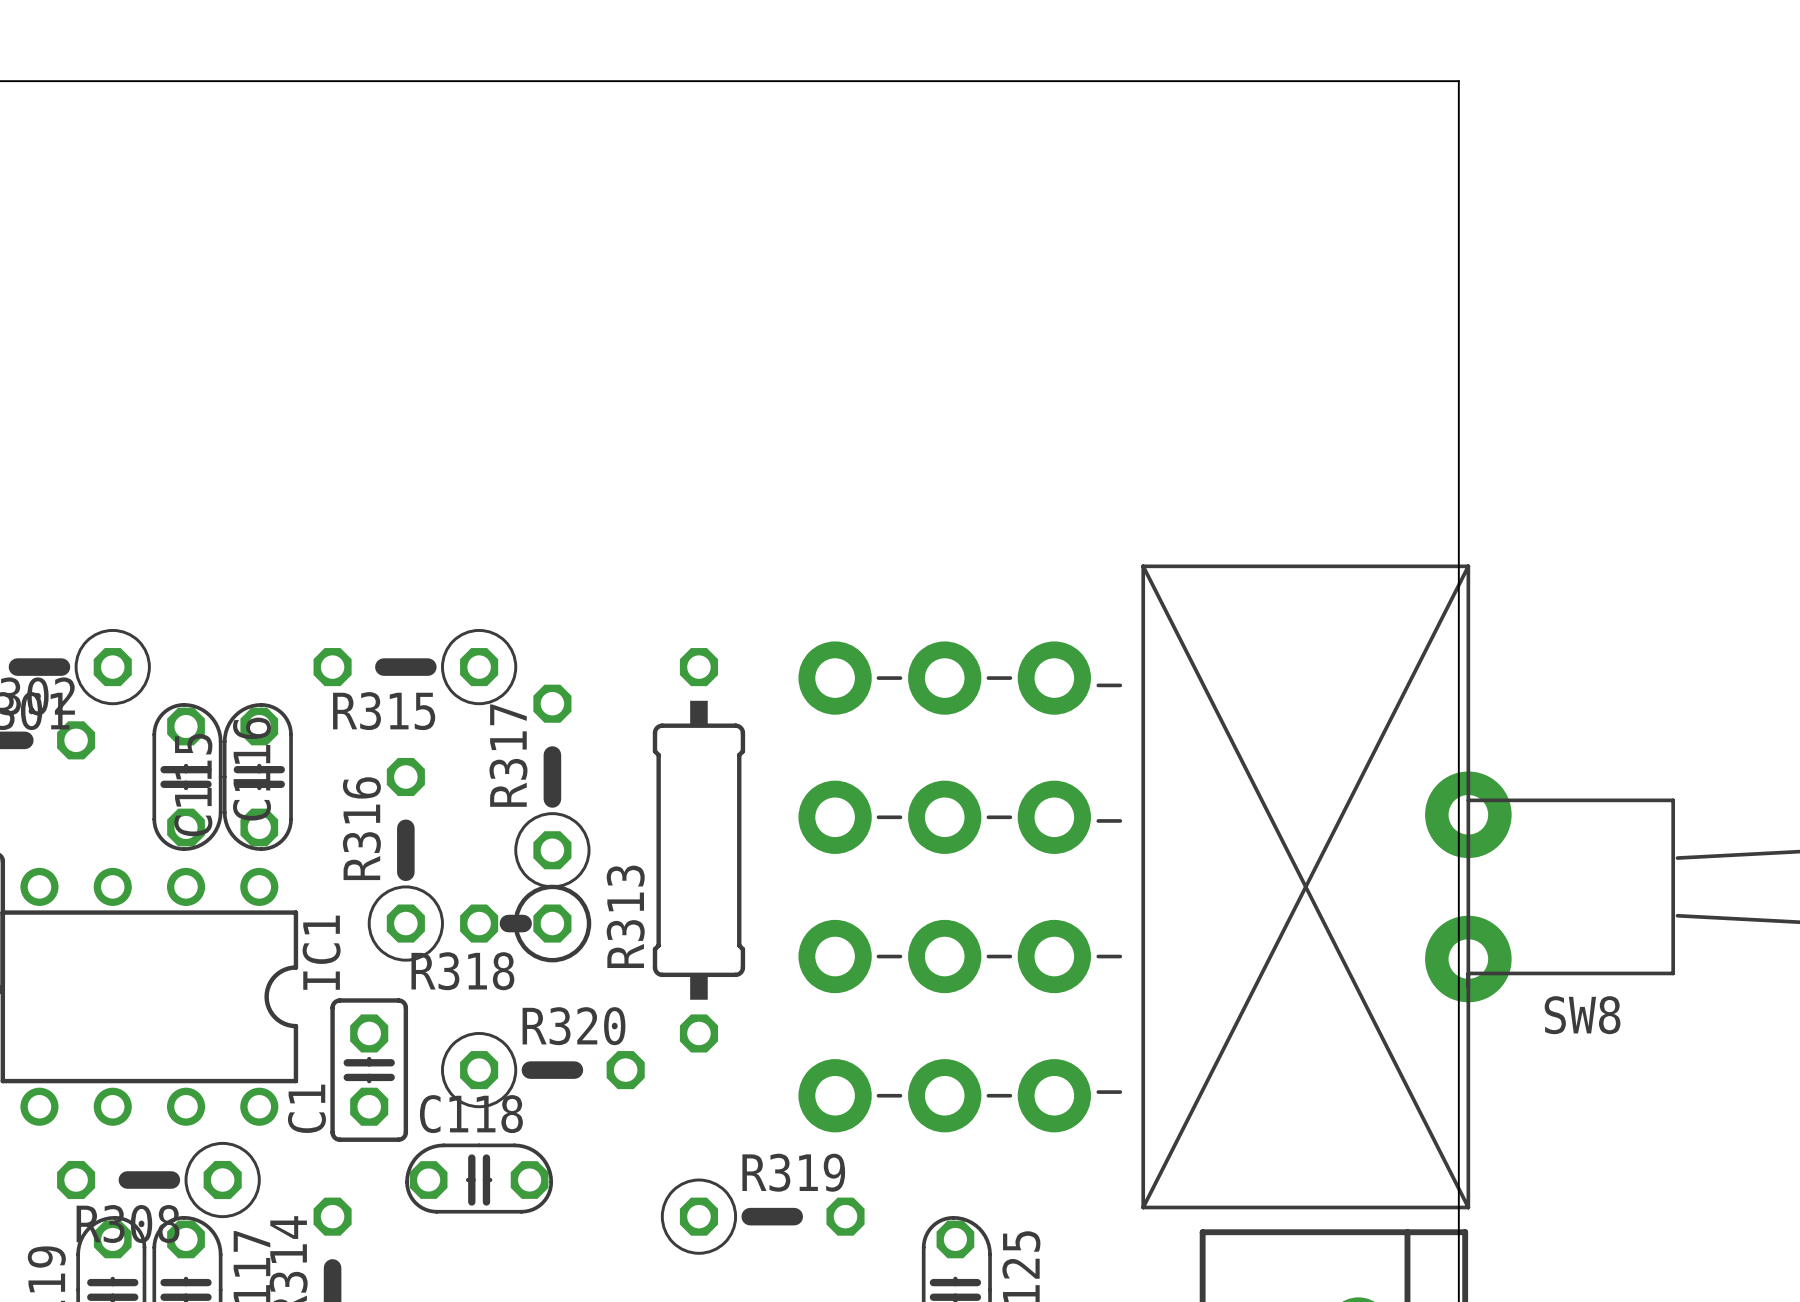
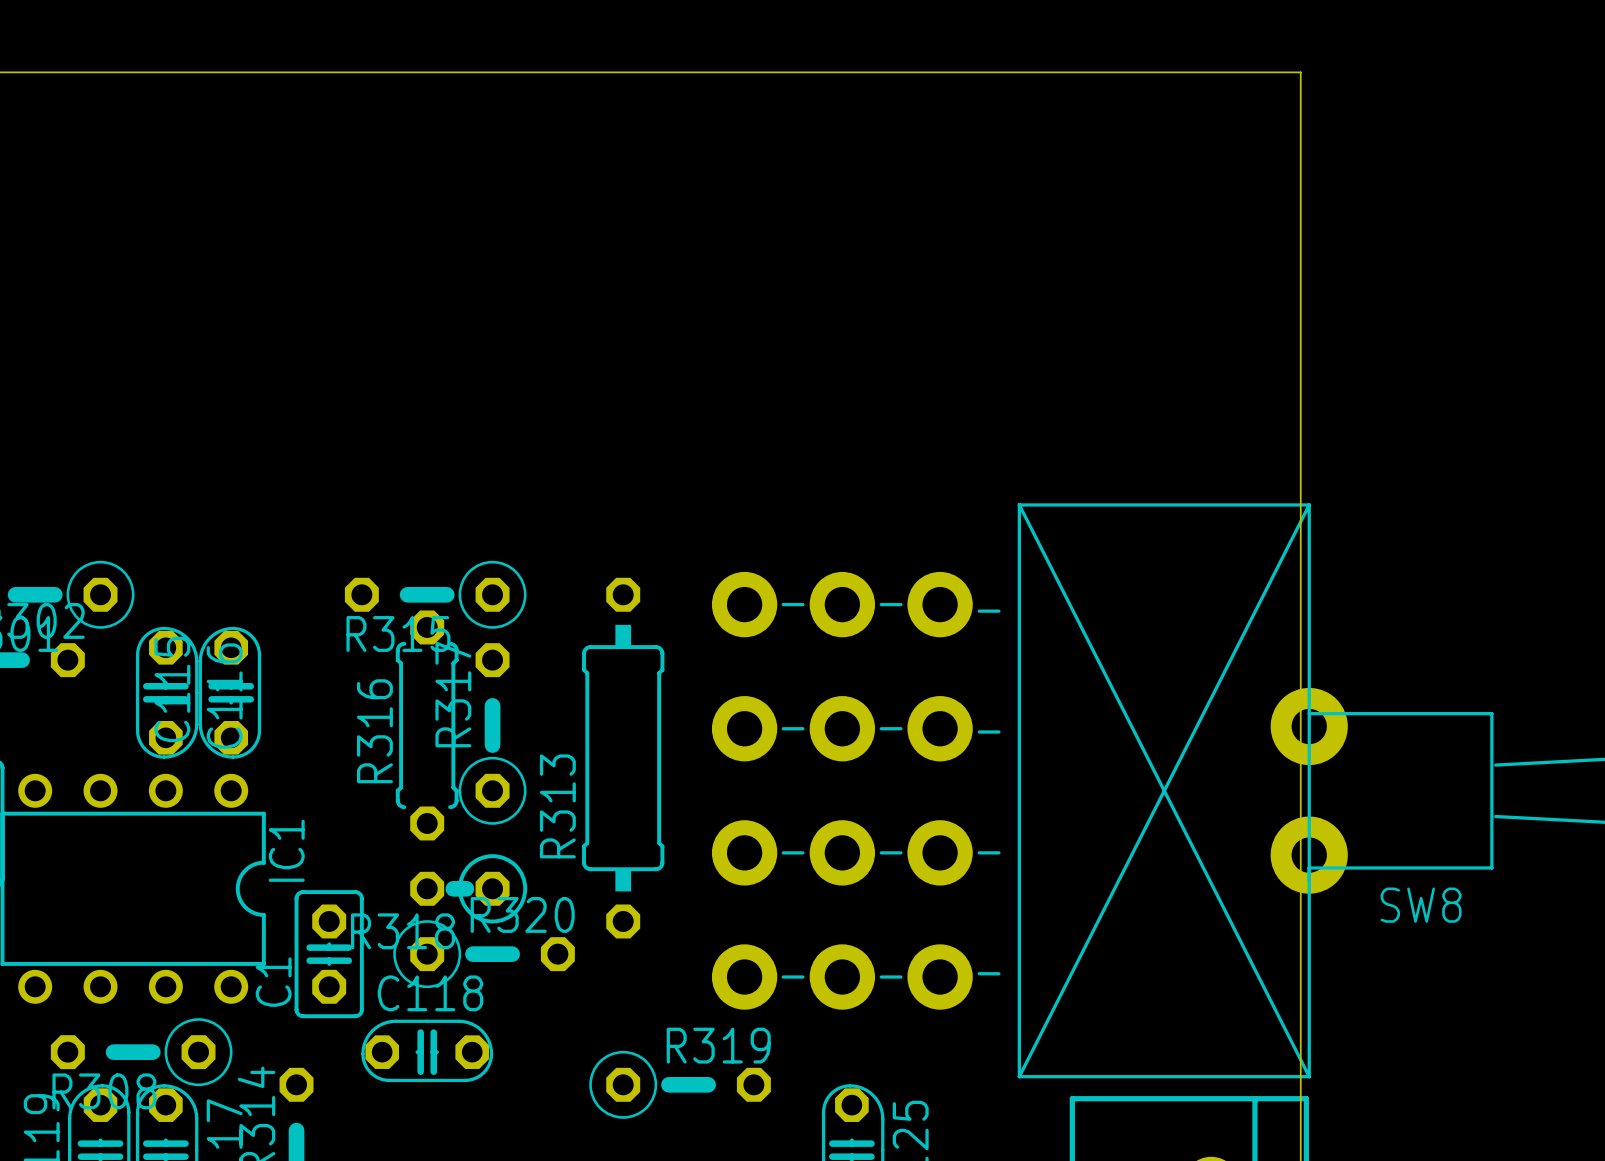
R315 position: (415, 667) -> (435, 594)
R316 footprint: [367, 757, 444, 962] -> [395, 610, 459, 841]
R317 position: (552, 786) -> (492, 733)
R318 position: (525, 923) -> (468, 888)

